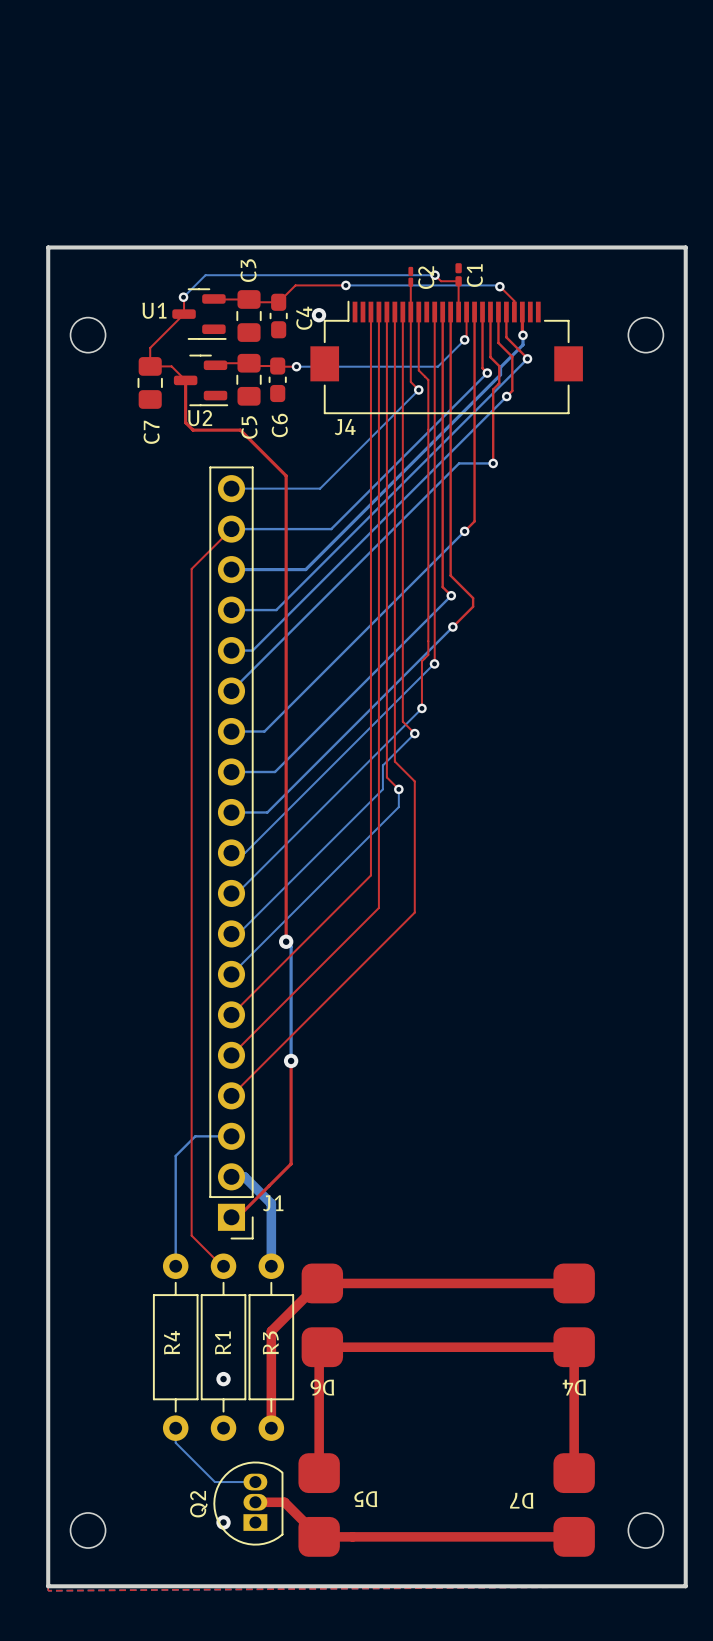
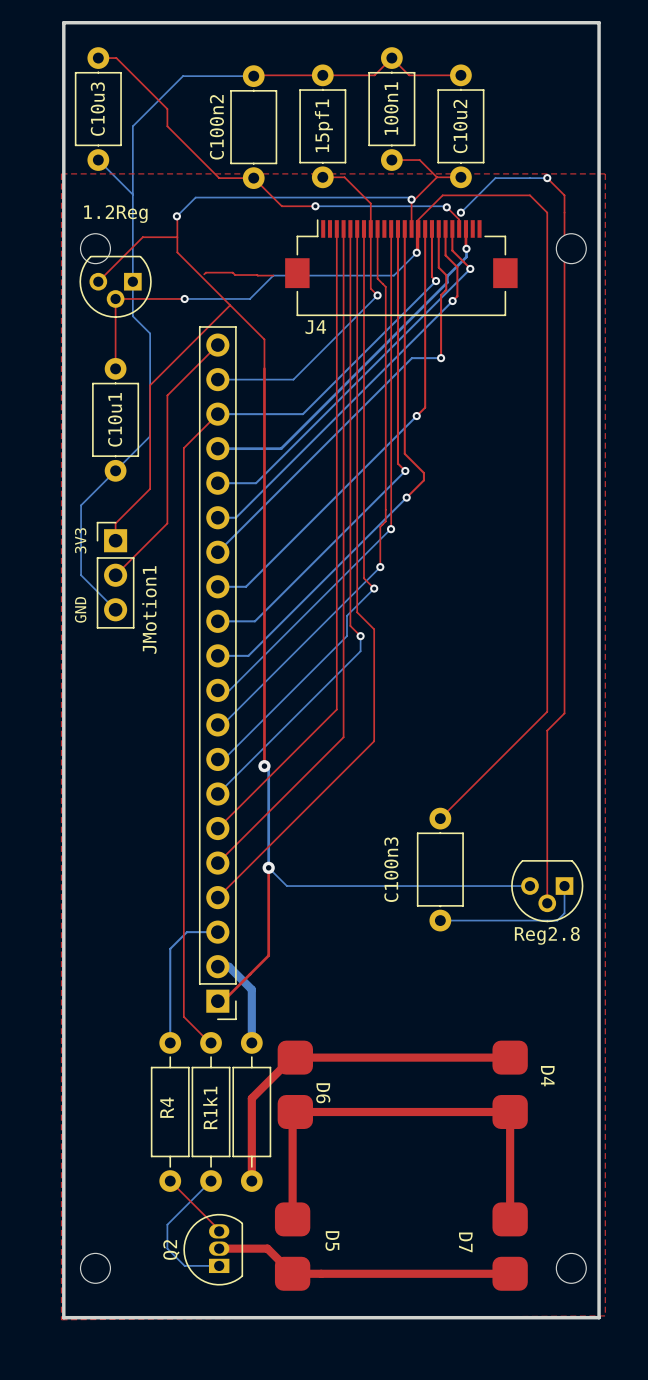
top track: none -> (460, 75) (409, 75) (391, 58) (374, 75) (253, 76)
bottom track: none -> (253, 76) (183, 76) (132, 126) (132, 316) (150, 333) (150, 436) (81, 505) (81, 575) (115, 609)
C10u3: none -> (98, 109)
100n1: none -> (391, 109)
15pf1: none -> (322, 126)
C10u2: none -> (460, 126)
C100n2: none -> (253, 127)
bottom track: none -> (98, 160) (132, 194)
top track: none -> (391, 160) (419, 160) (436, 177)
board edge: (48, 247) (685, 247) (685, 1586) (48, 1586) (48, 247) -> (63, 22) (63, 1317) (599, 1317) (599, 22) (63, 22)
top track: none -> (322, 177) (344, 177) (370, 203)
top track: none -> (436, 177) (460, 177)
top track: none -> (547, 178) (564, 195) (564, 713) (547, 730) (547, 903)
bottom track: none -> (547, 178) (495, 178) (460, 212)
via: none -> (547, 178)
C1: (458, 274) -> none
top track: (435, 275) (441, 281) (458, 281) -> (436, 177) (411, 202)
bottom track: none -> (391, 197) (409, 197) (411, 199)
via position: (435, 275) -> (411, 199)
C2: (410, 276) -> none
top track: (306, 285) (295, 285) (278, 302) (213, 298) -> (281, 206) (253, 178) (219, 178) (167, 126) (167, 109) (116, 58) (98, 58)
via: none -> (460, 212)
top track: (184, 314) (150, 347) (150, 366) (171, 366) (185, 380) (185, 422) (193, 430) (240, 430) (286, 475) -> (177, 230) (177, 252) (264, 339) (264, 368)
U1: (199, 314) -> none
via: (318, 315) -> none
C3: (249, 316) -> none
C4: (278, 316) -> none
top track: none -> (177, 237) (142, 237) (98, 281)
top track: none -> (416, 252) (416, 221) (442, 195) (529, 195) (547, 212) (547, 711) (440, 818)
bottom track: none -> (273, 275) (249, 298) (184, 298)
via: (296, 366) -> none
1.2Reg: none -> (115, 286)
C5: (249, 379) -> none
C6: (277, 379) -> none
U2: (201, 380) -> none
C7: (150, 382) -> none
top track: none -> (184, 298) (115, 298) (115, 368)
via: none -> (184, 298)
top track: none -> (230, 305) (150, 385) (150, 488) (115, 523) (115, 540)
top track: none -> (217, 345) (167, 395) (167, 523) (115, 575)
C10u1: none -> (115, 419)
text: none -> 3V3 (80, 540)
JMotion1: none -> (115, 575)
text: none -> GND (80, 609)
part: none -> (217, 673)
J1: (231, 852) -> none
bottom track: none -> (268, 867) (286, 886) (529, 886)
C100n3: none -> (440, 869)
bottom track: none -> (564, 886) (564, 913) (557, 920) (440, 920)
Reg2.8: none -> (547, 891)
R1 name: R1 (222, 1342) -> R1k1 (210, 1107)
R3 name: R3 (270, 1342) -> none
via: (223, 1379) -> none
D6 name rotation: 0° (322, 1387) -> 90° counterclockwise (323, 1093)
D6 name position: D6 (322, 1387) -> D6 (323, 1093)
D4 name rotation: 0° (574, 1387) -> 90° counterclockwise (547, 1076)
D4 name position: D4 (574, 1387) -> D4 (547, 1076)
top track: none -> (170, 1181) (219, 1231)
bottom track: (175, 1428) (175, 1442) (214, 1482) (255, 1482) -> none
bottom track: none -> (211, 1181) (167, 1224) (167, 1248) (184, 1265) (219, 1265)
D5 name rotation: 0° (365, 1499) -> 90° counterclockwise (332, 1241)
D7 name rotation: 0° (521, 1500) -> 90° counterclockwise (465, 1242)
top track: (255, 1502) (284, 1502) (289, 1507) -> (219, 1248) (267, 1248)
Q2 position: (248, 1503) -> (213, 1249)
via: (223, 1522) -> none

